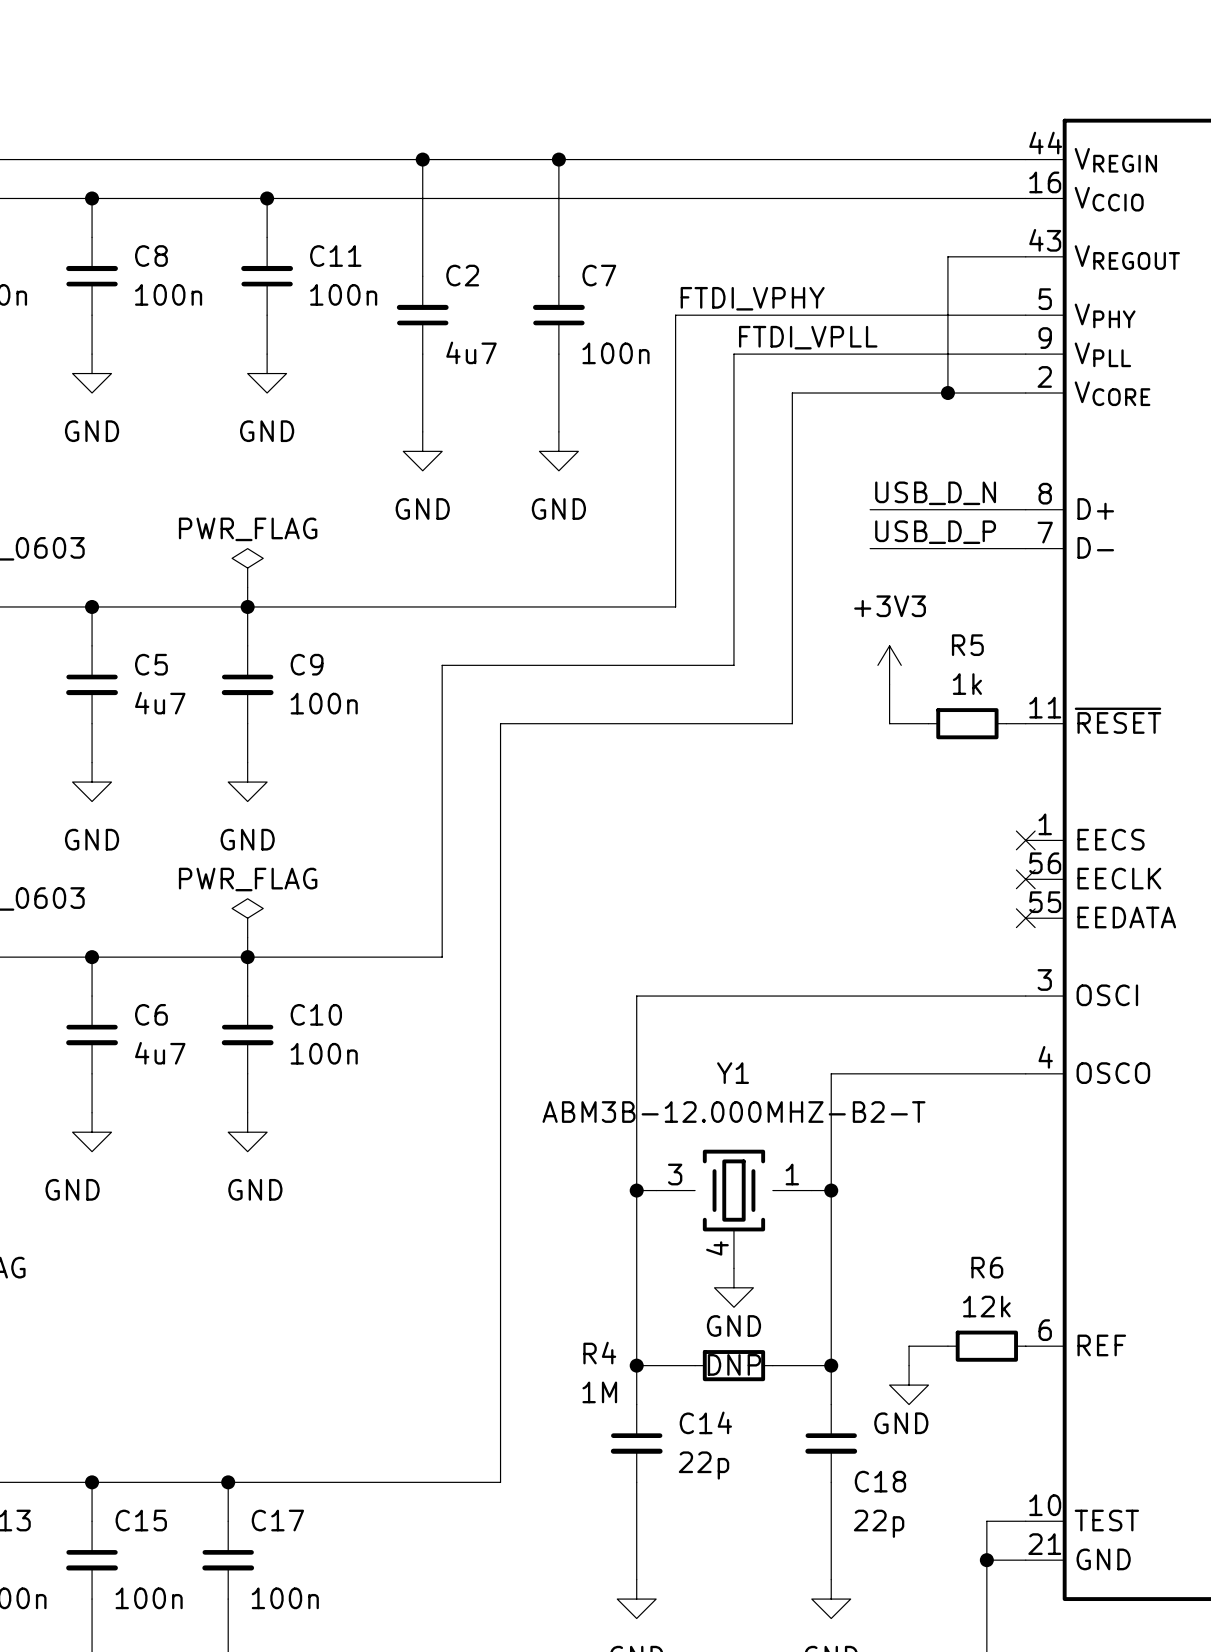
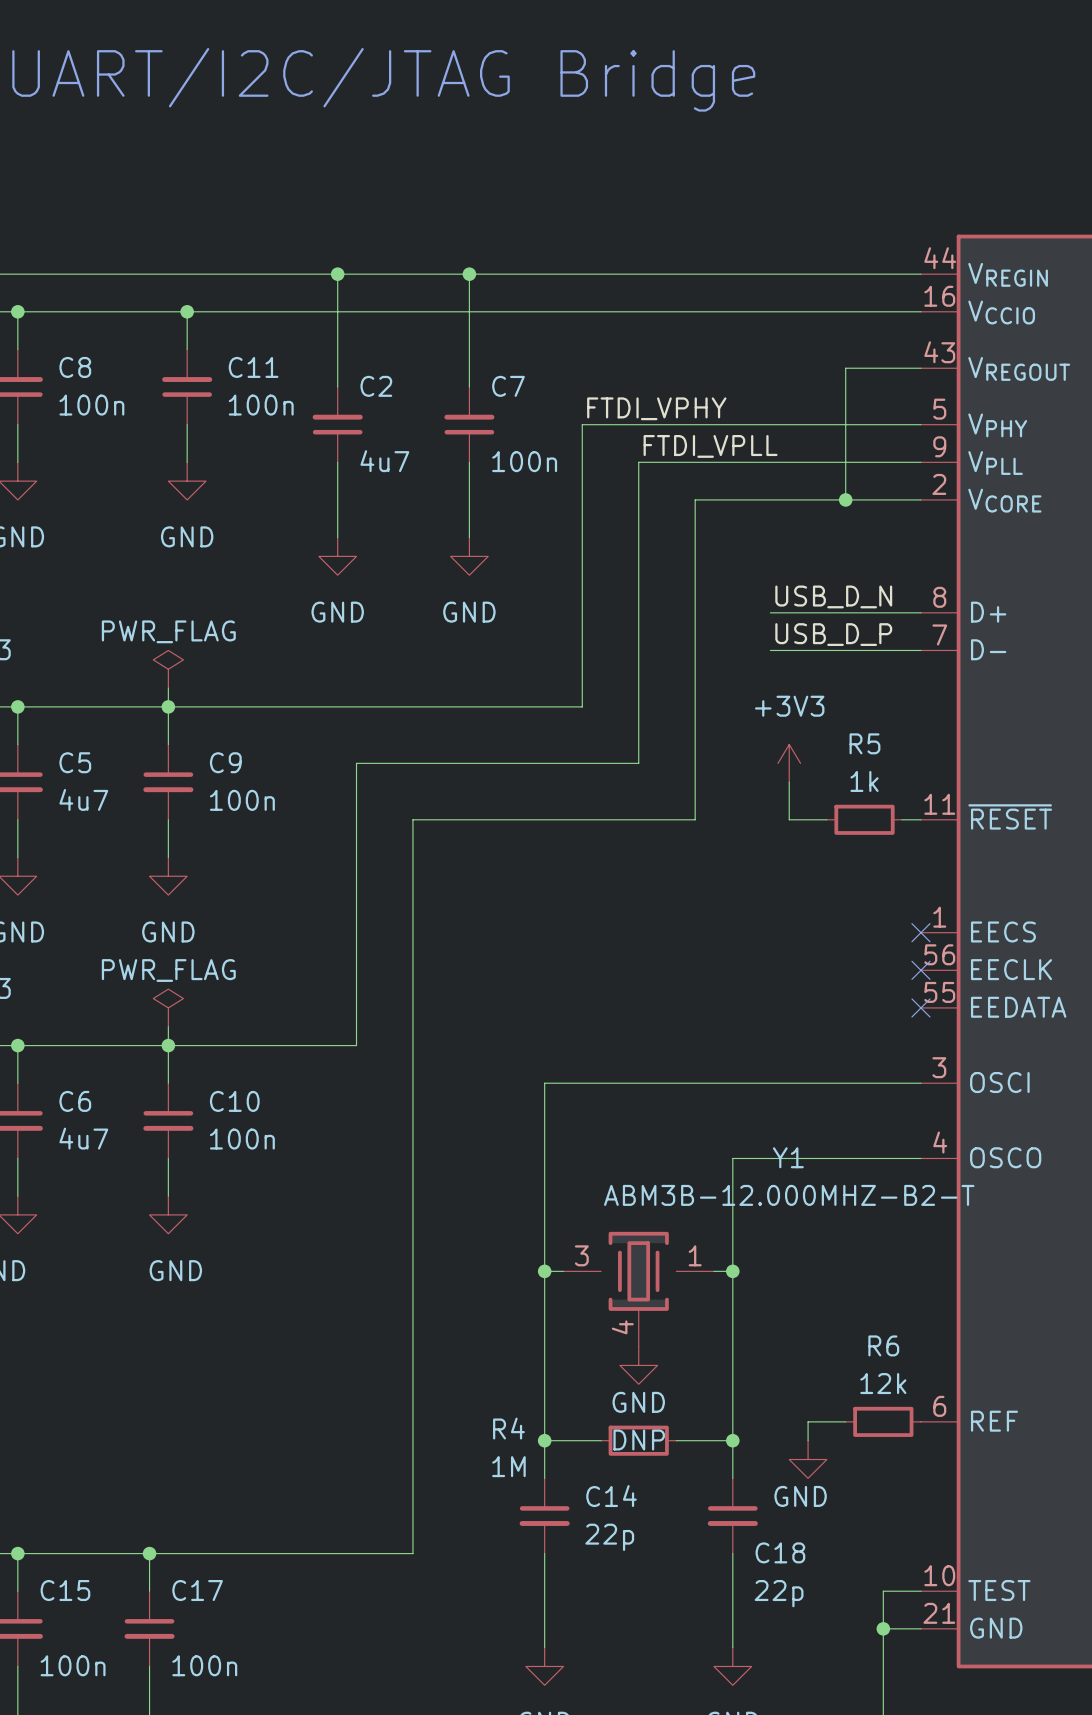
Y1 name position: Y1 (733, 1073) -> Y1 (788, 1157)
Y1 value position: ABM3B-12.000MHZ-B2-T (733, 1112) -> ABM3B-12.000MHZ-B2-T (789, 1195)

